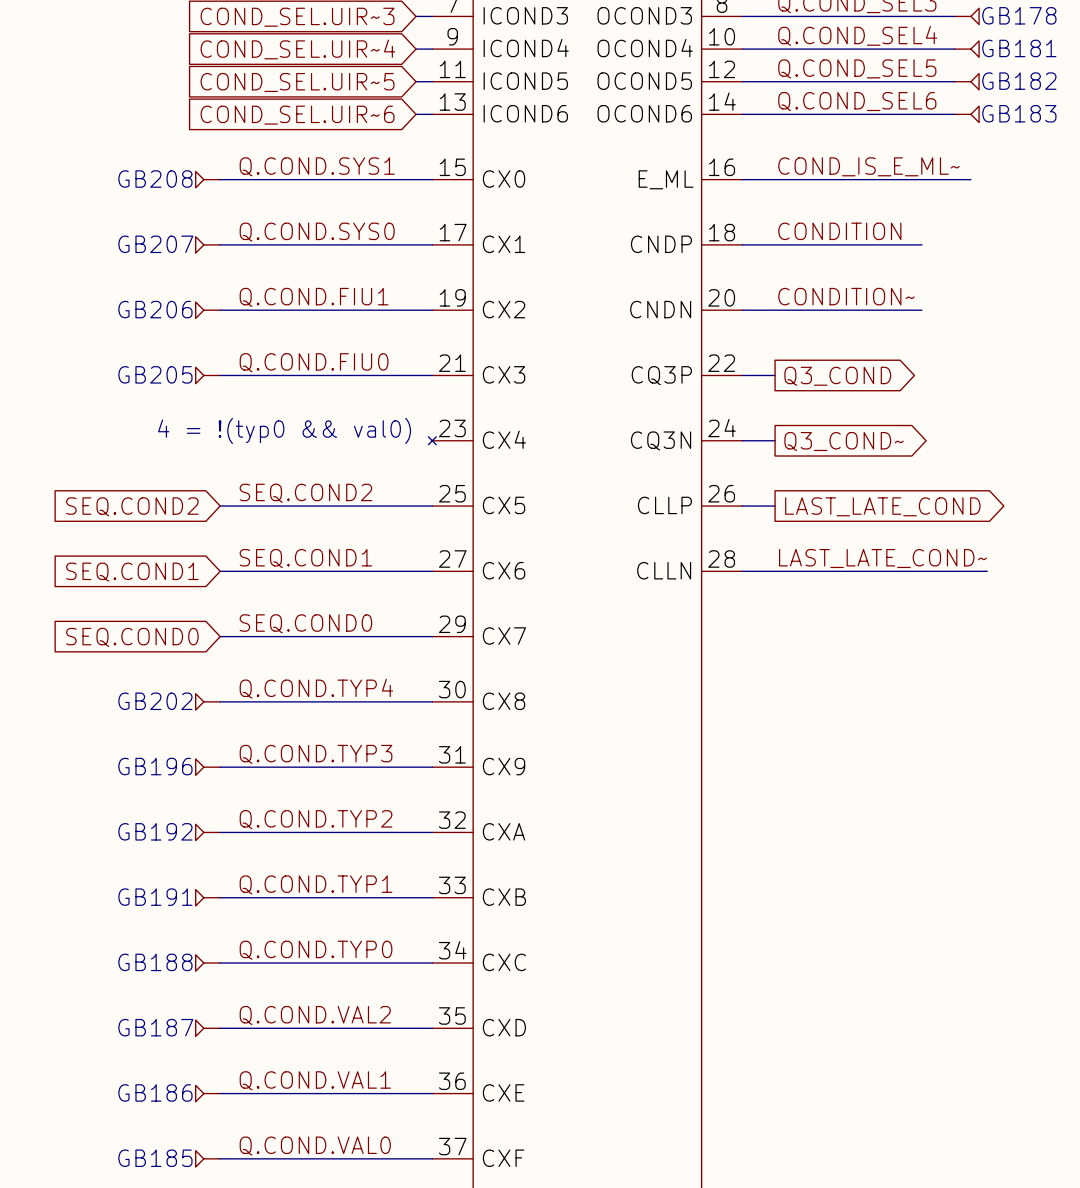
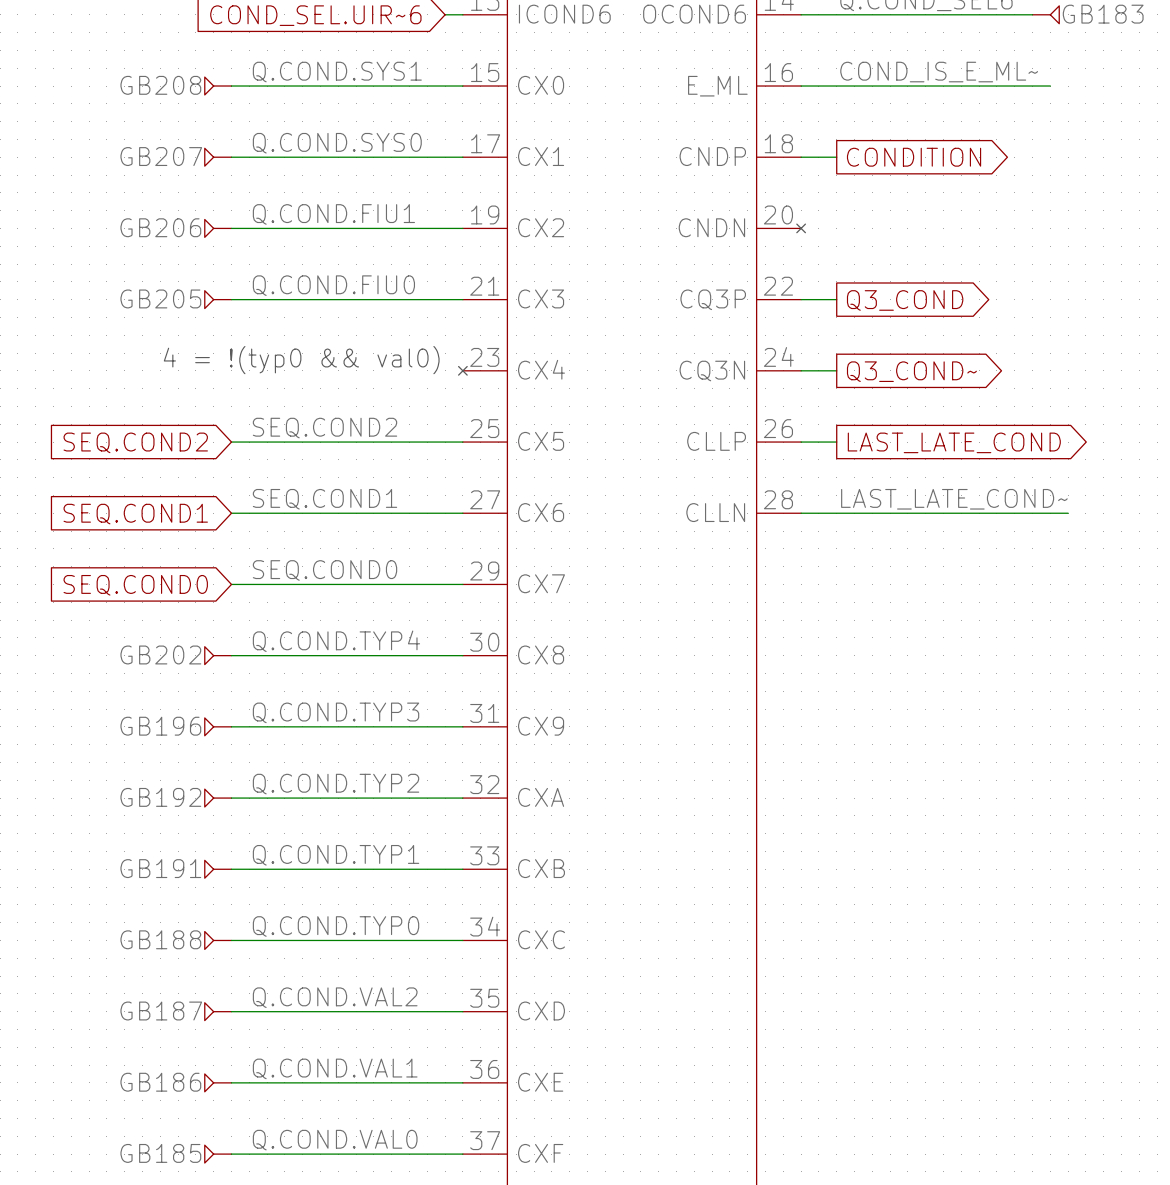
label: CONDITION (839, 231) -> none
wire: (775, 244) (921, 244) -> none
global label: none -> CONDITION (914, 157)
label: CONDITION~ (846, 296) -> none
wire: (742, 310) (921, 310) -> none
no-connect mark: none -> (801, 228)

